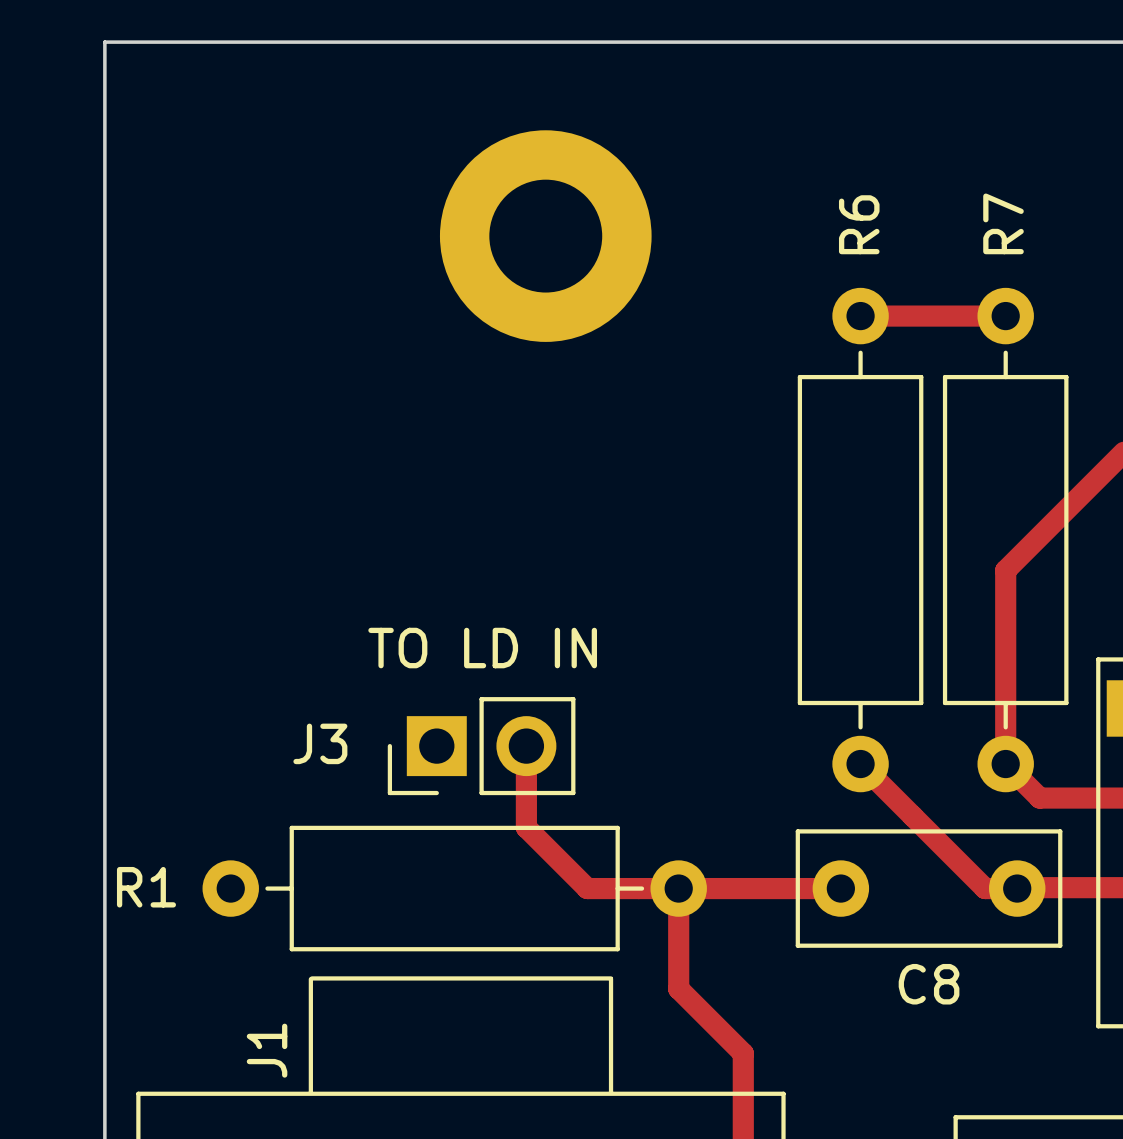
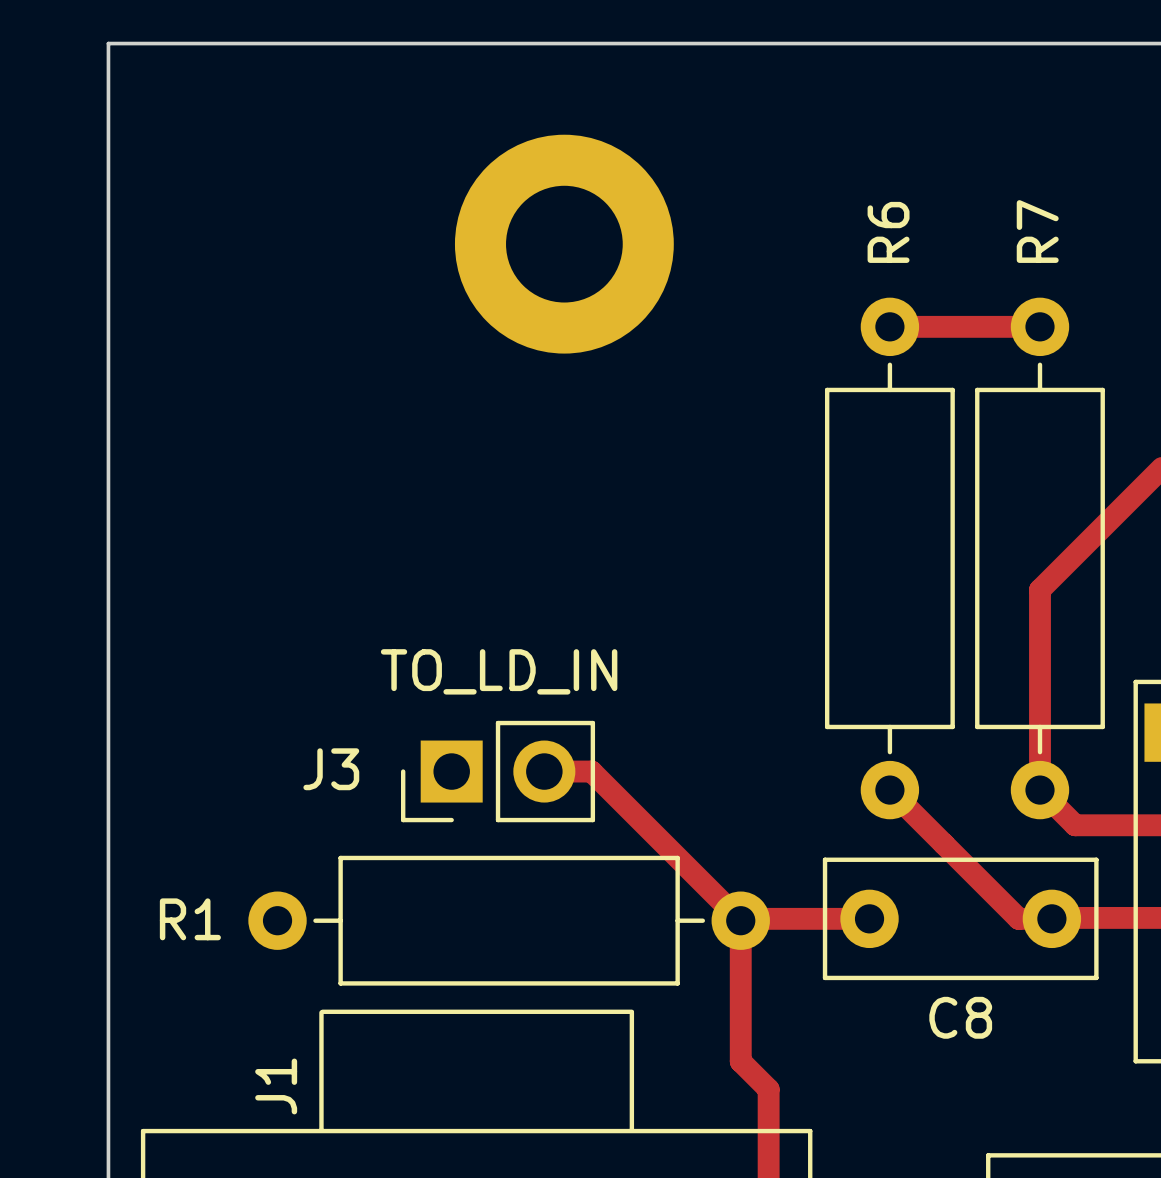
J3 value: TO LD IN (482, 648) -> TO_LD_IN (499, 671)
track: (526, 746) (526, 827) (587, 888) (718, 888) -> (544, 771) (591, 771) (740, 920) (740, 1061)
R1 position: (454, 888) -> (509, 920)
track: (678, 888) (678, 988) (716, 1026) -> none

